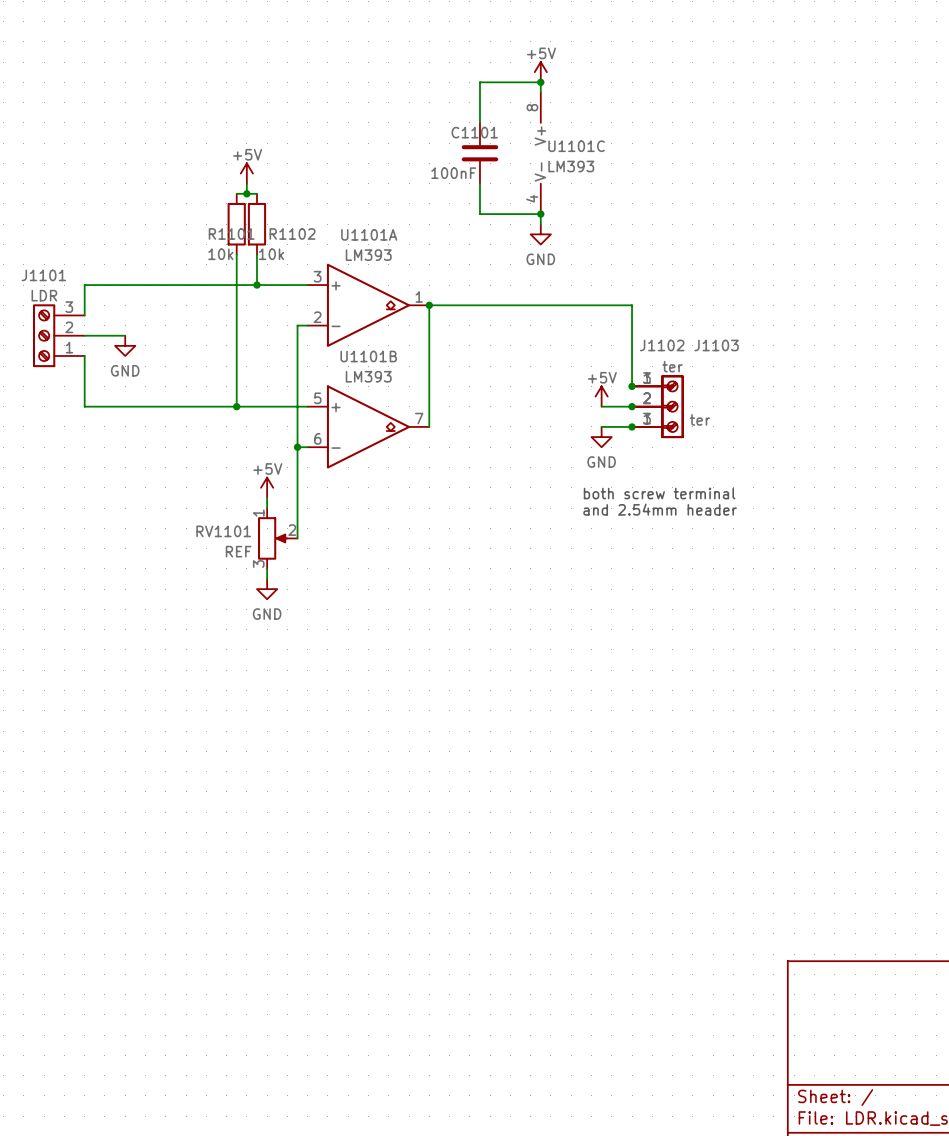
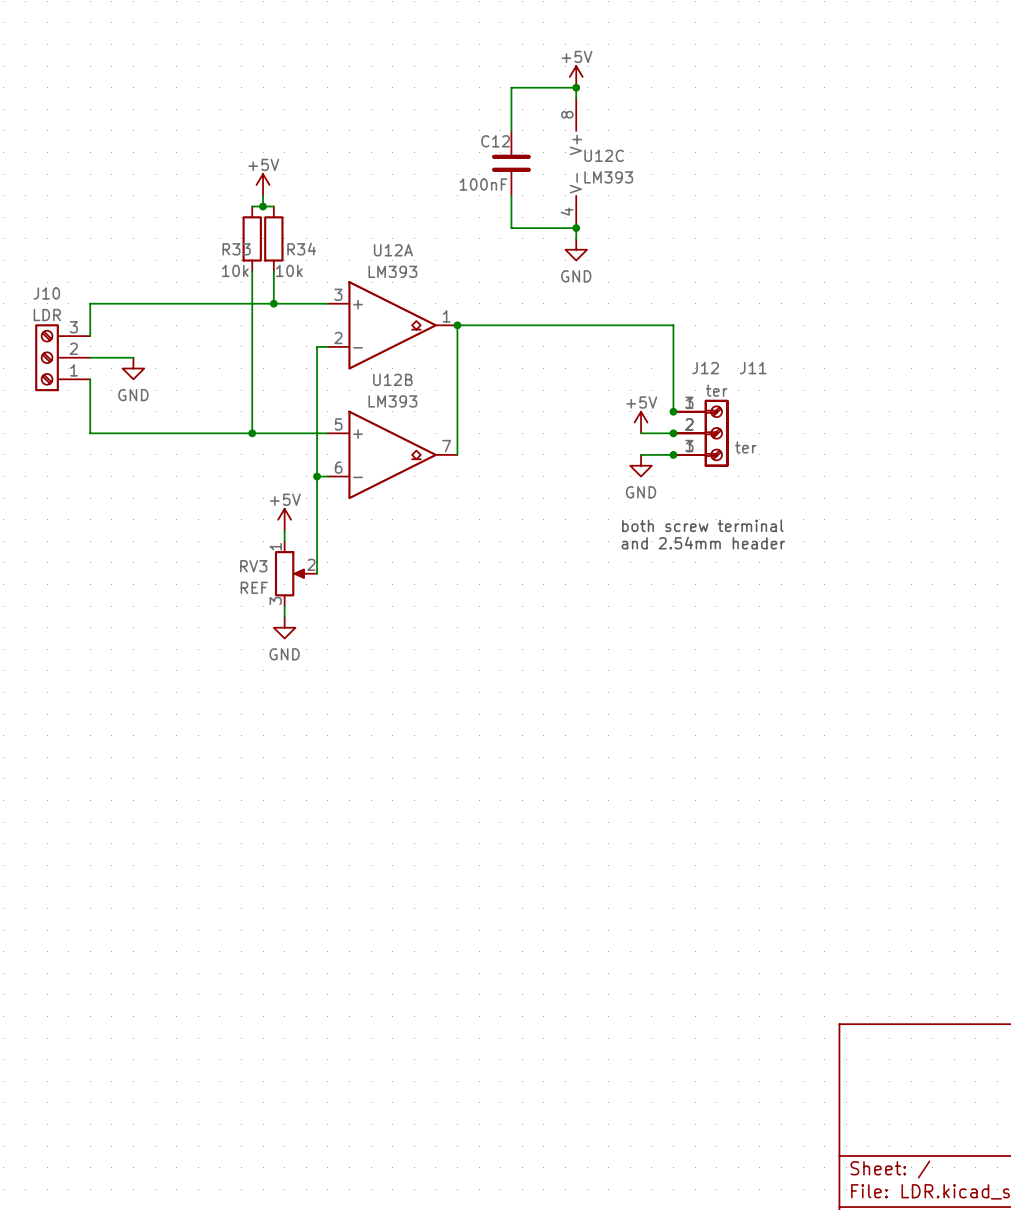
C1101 name: C1101 (474, 132) -> C12 (495, 141)
U1101C name: U1101C (576, 146) -> U12C (604, 155)
R1101 name: R1101 (231, 233) -> R33 (236, 249)
R1102 name: R1102 (292, 233) -> R34 (301, 249)
U1101A name: U1101A (369, 234) -> U12A (393, 250)
J1101 name: J1101 (43, 275) -> J10 (46, 293)
J1102 name: J1102 (662, 345) -> J12 (705, 368)
J1103 name: J1103 (716, 345) -> J11 (753, 368)
U1101B name: U1101B (368, 356) -> U12B (392, 379)
RV1101 name: RV1101 (223, 531) -> RV3 (253, 566)

